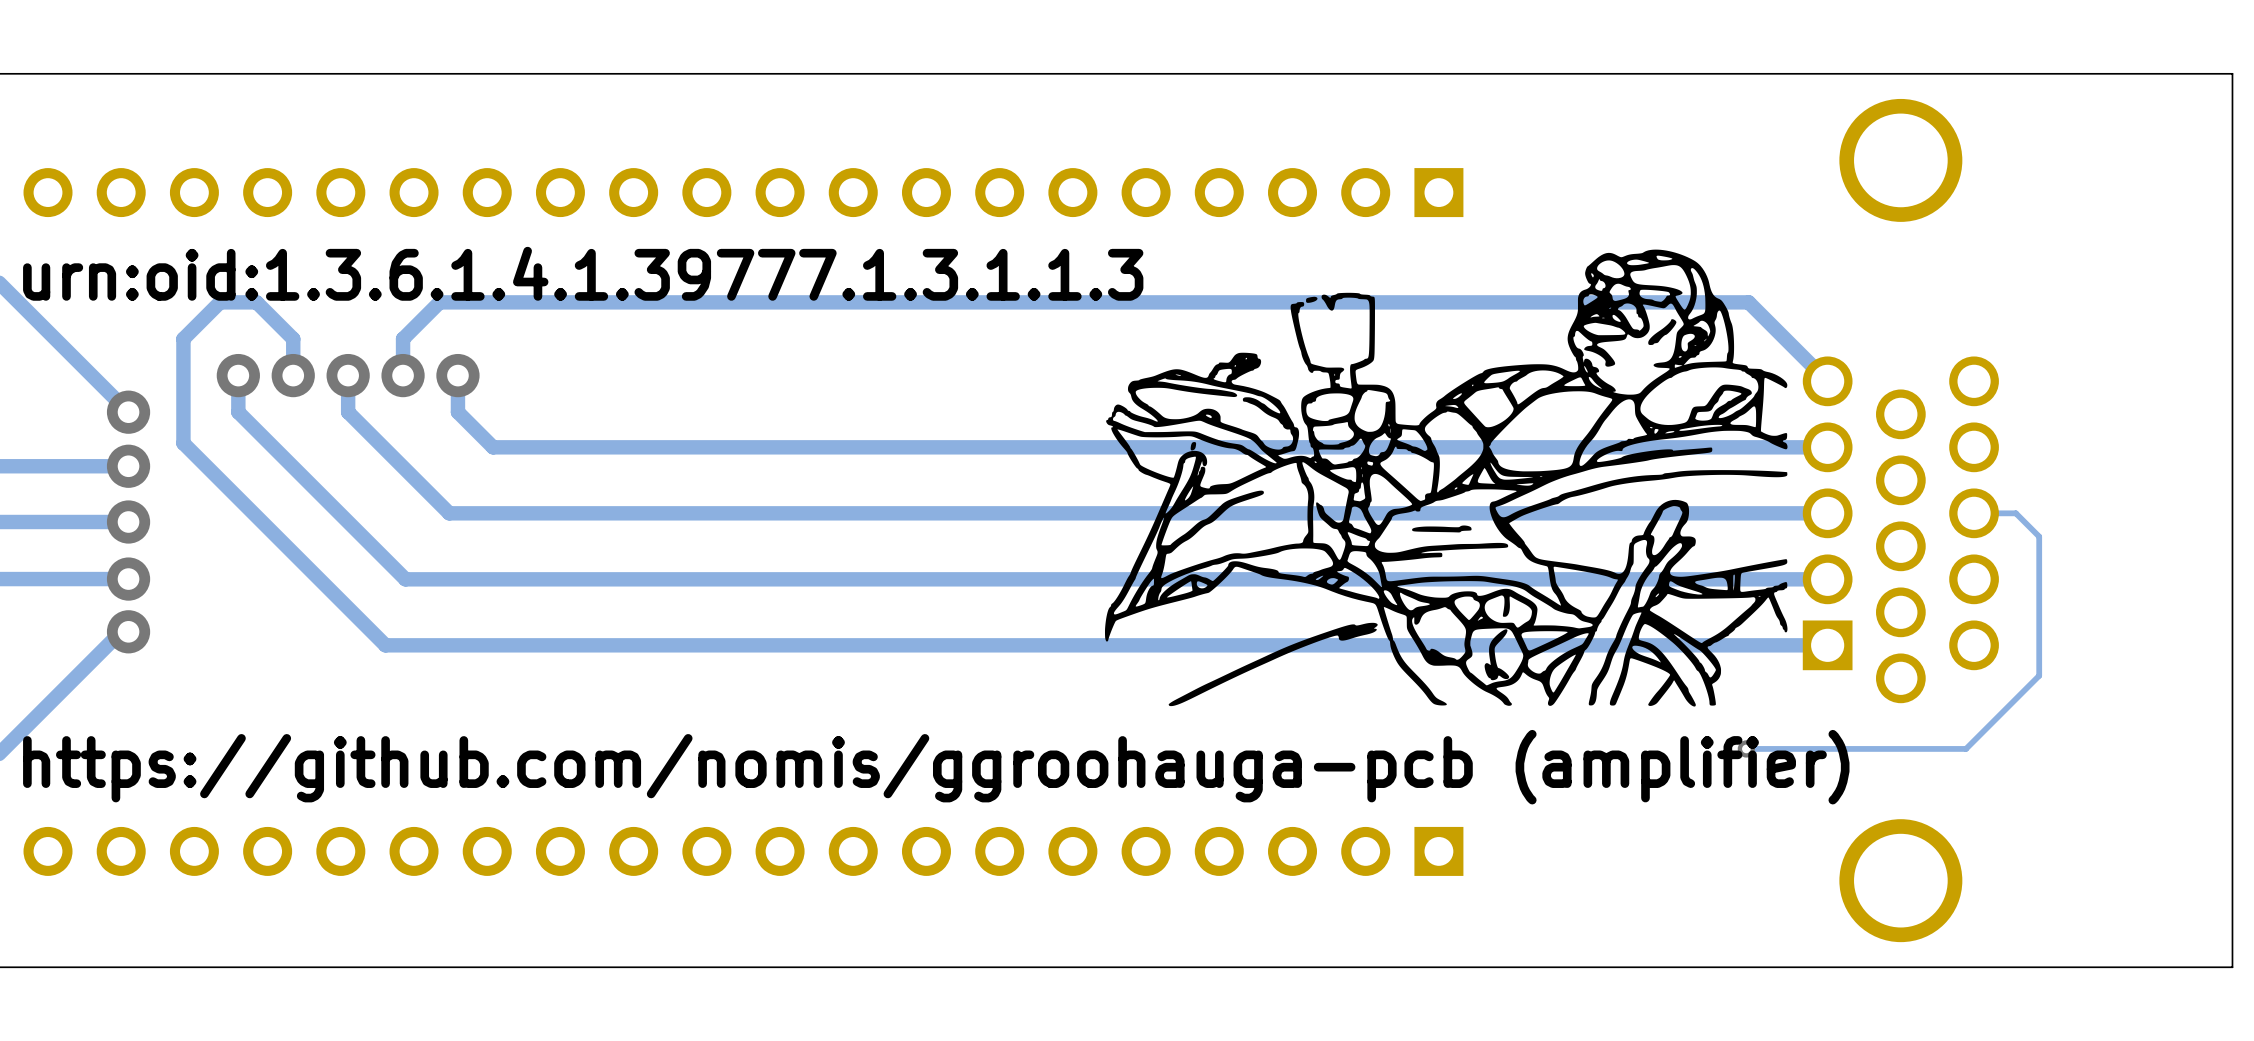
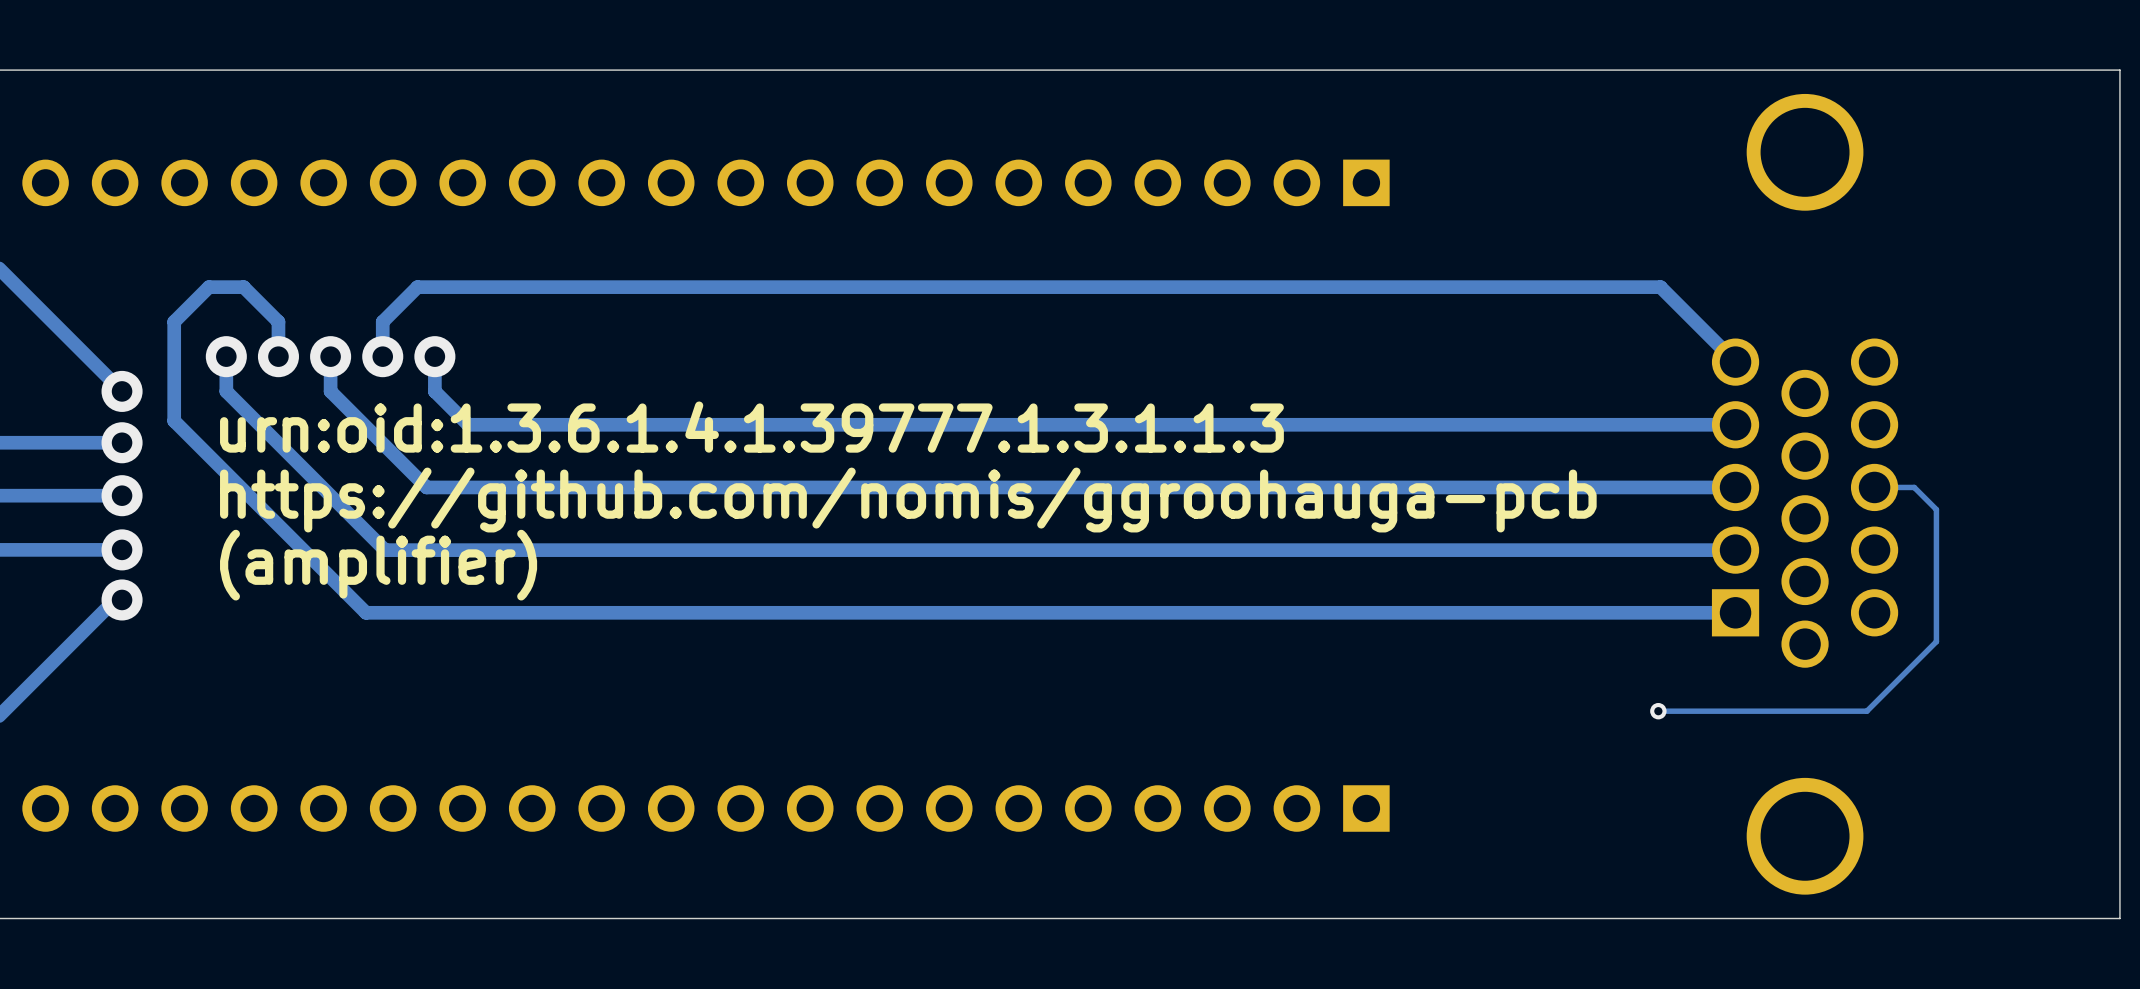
drawing: [1104, 249, 1788, 707] -> none
text position: urn:oid:1.3.6.1.4.1.39777.1.3.1.1.3 (583, 273) -> urn:oid:1.3.6.1.4.1.39777.1.3.1.1.3 (751, 427)
text: none -> https://github.com/nomis/ggroohauga-pcb (908, 500)
text: none -> (amplifier) (378, 565)
text: https://github.com/nomis/ggroohauga-pcb (amplifier) (936, 767) -> none

